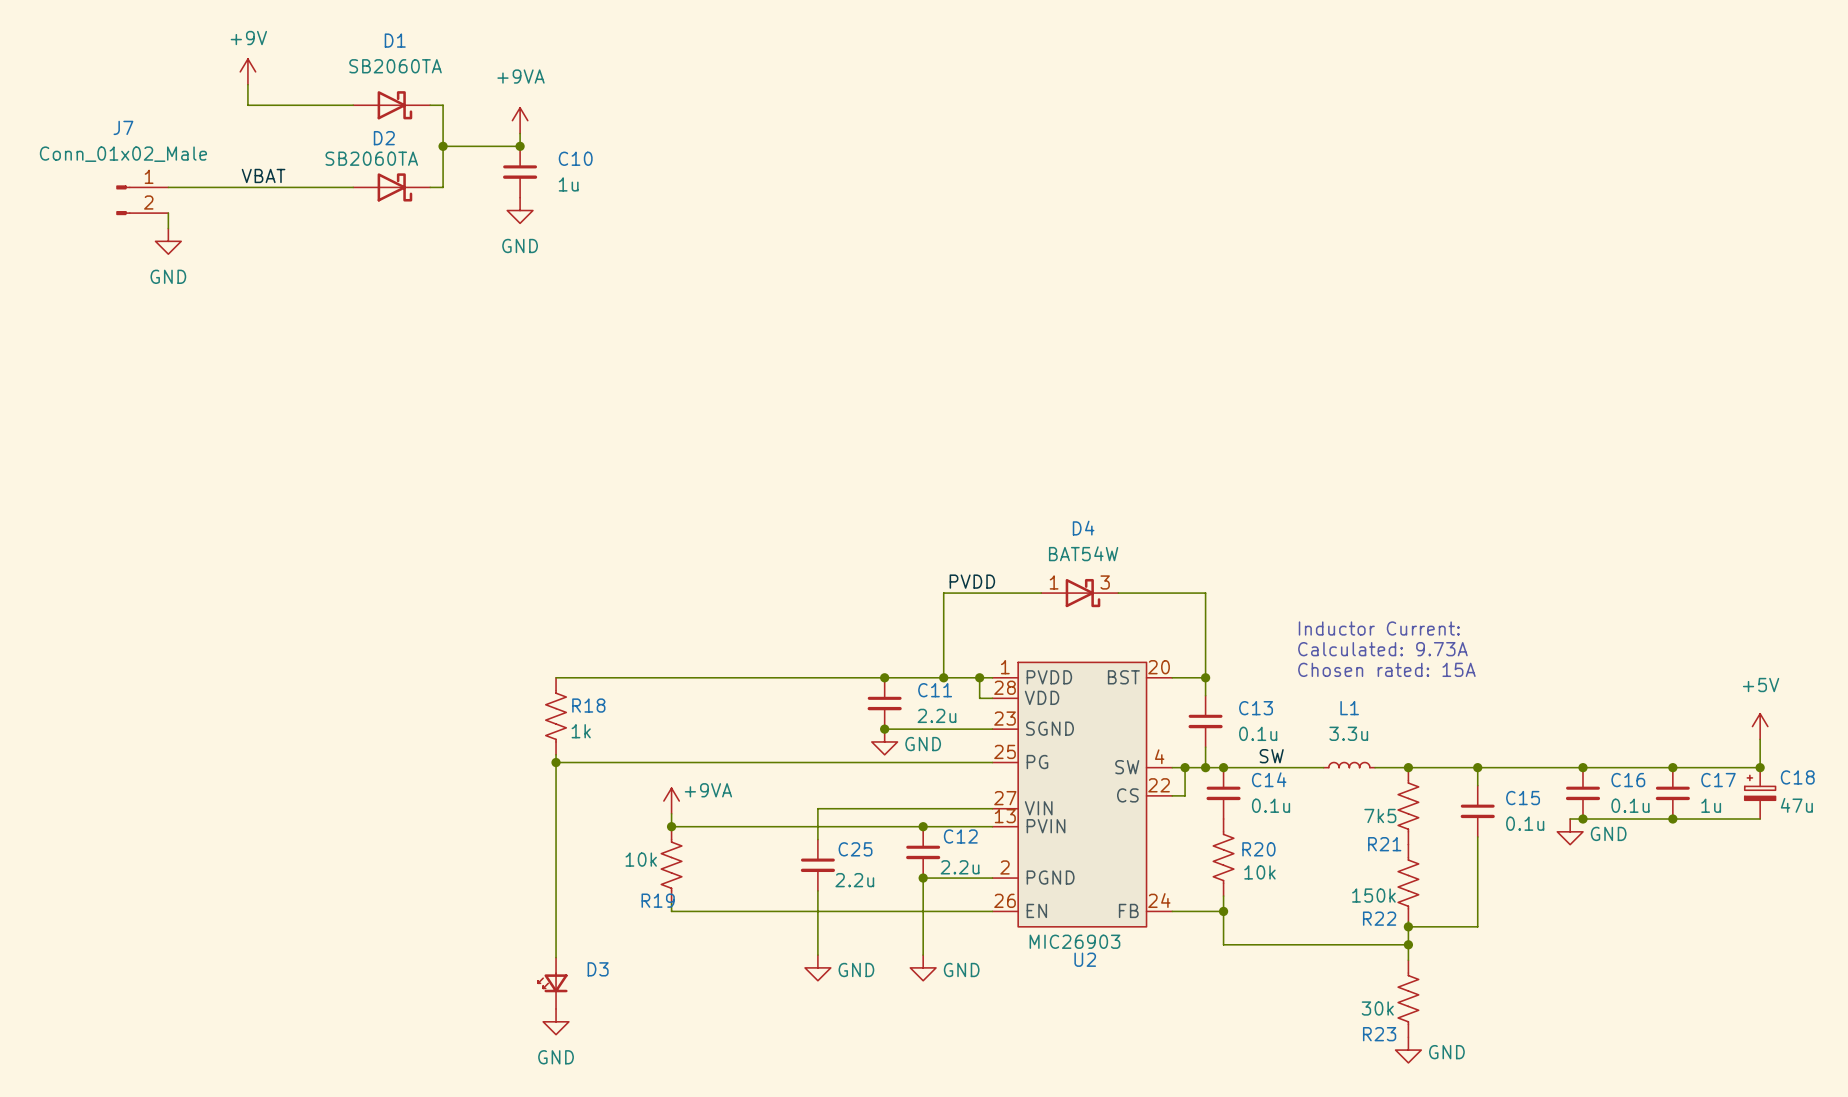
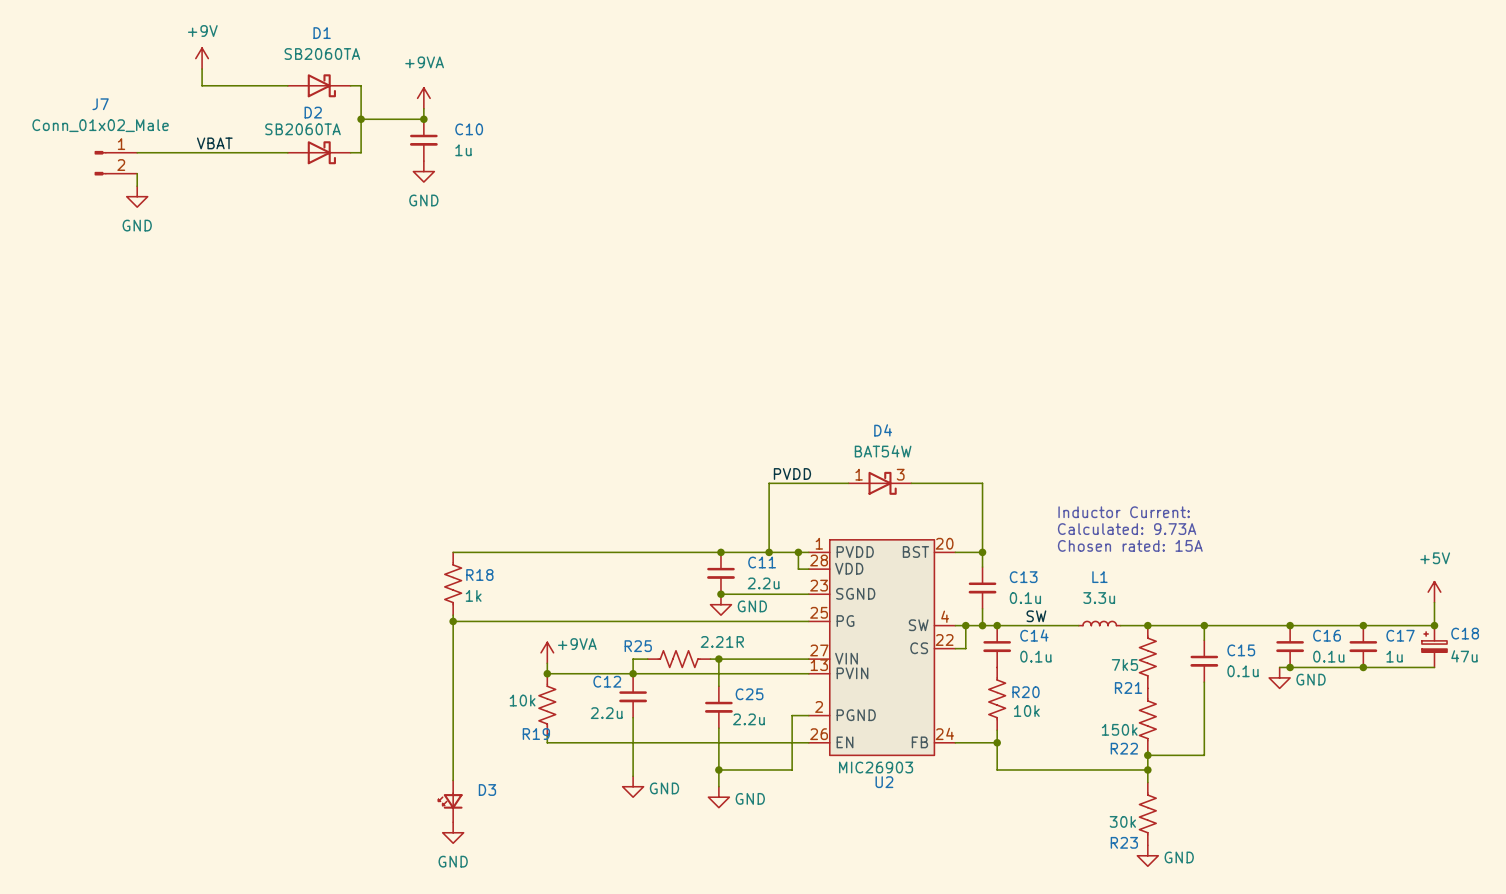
wire: none -> (647, 659) (633, 659) (633, 675)
R25: none -> 2.21R (679, 659)
wire: (871, 808) (817, 808) (817, 839) -> none
wire: none -> (718, 659) (718, 686)
junction: none -> (718, 659)
junction: none -> (633, 673)
junction: (923, 826) -> none
C12 name position: C12 (960, 836) -> C12 (607, 681)
C12 position: (923, 852) -> (633, 696)
C25 position: (817, 865) -> (718, 707)
C12 value position: 2.2u (960, 867) -> 2.2u (606, 713)
junction: (923, 878) -> none
wire: (971, 878) (923, 878) (923, 955) -> (792, 715) (792, 769) (718, 769)
wire: none -> (633, 717) (633, 776)
wire: (817, 890) (817, 955) -> none
wire: none -> (718, 728) (718, 786)
junction: none -> (718, 769)
power symbol: none -> GND (633, 786)
power symbol: GND (817, 967) -> none
power symbol: GND (923, 967) -> none
power symbol: none -> GND (718, 797)

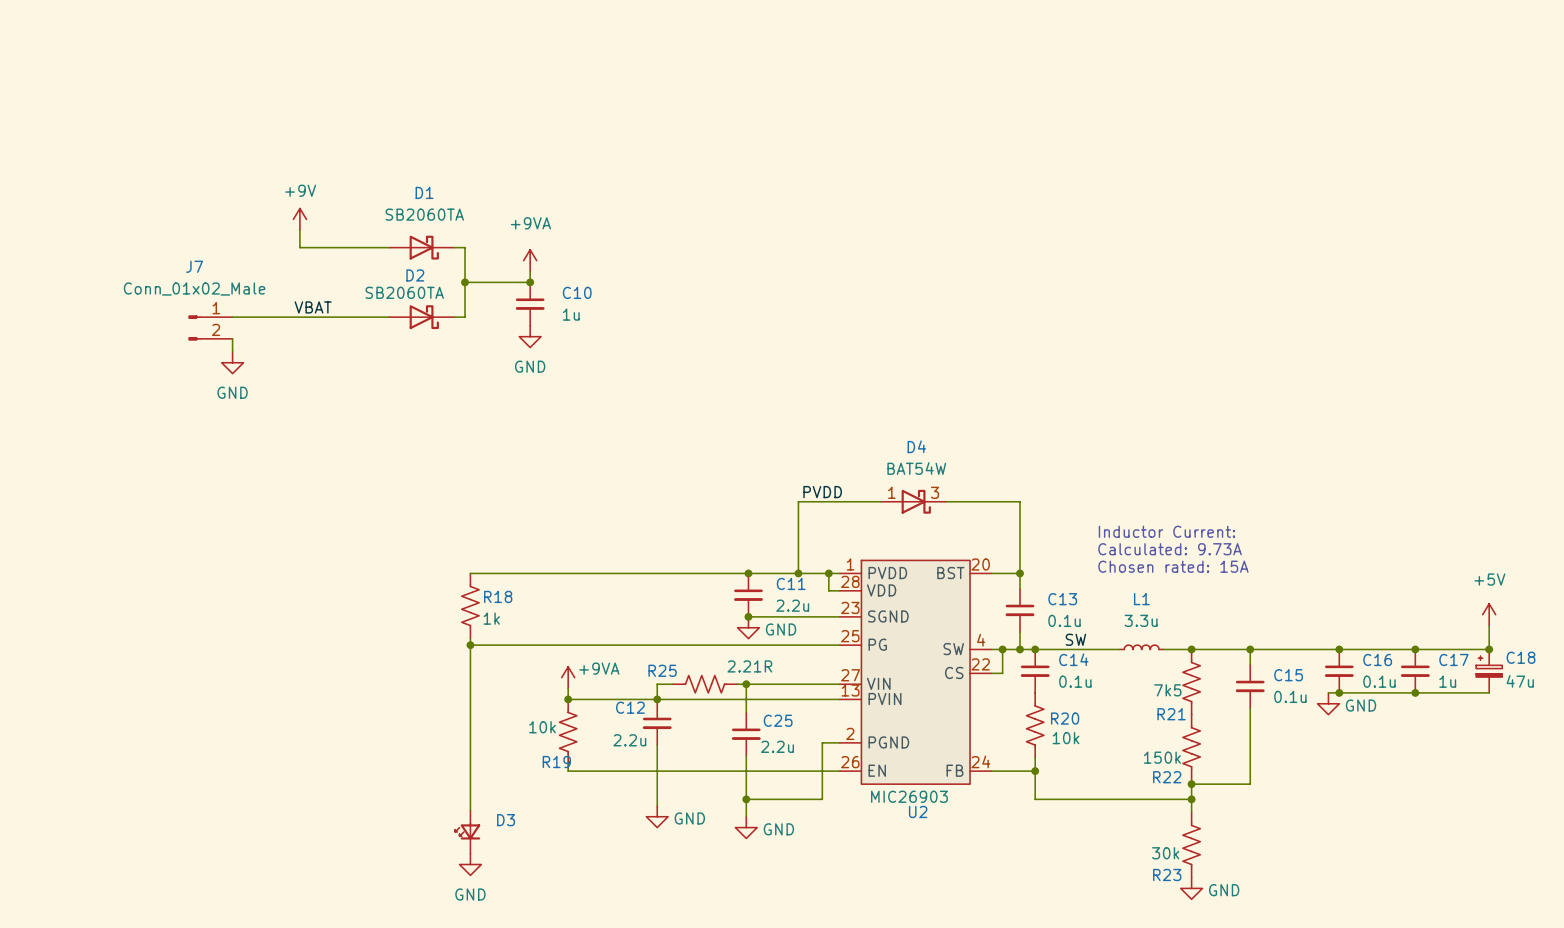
power symbol position: +9V (202, 58) -> +9V (299, 219)
wire: (202, 69) (202, 85) (287, 85) -> (299, 230) (299, 247) (388, 247)
D1 position: (319, 85) -> (421, 247)
wire: (350, 85) (361, 85) (361, 152) (350, 152) -> (454, 247) (465, 247) (465, 317) (454, 317)
power symbol position: +9VA (423, 98) -> +9VA (530, 260)
wire: (423, 108) (423, 119) (361, 119) -> (530, 271) (530, 282) (465, 282)
junction: (361, 119) -> none
junction: (423, 119) -> none
C10 position: (423, 140) -> (530, 304)
label position: VBAT (214, 143) -> VBAT (313, 307)
wire: (137, 152) (287, 152) -> (232, 317) (388, 317)
D2 position: (319, 152) -> (421, 317)
J7 position: (115, 163) -> (210, 327)
power symbol: GND (423, 171) -> none
wire: (137, 173) (137, 186) -> (232, 338) (232, 351)
power symbol: GND (137, 196) -> none
junction: none -> (465, 282)
junction: none -> (530, 282)
power symbol: none -> GND (530, 336)
power symbol: none -> GND (232, 362)

